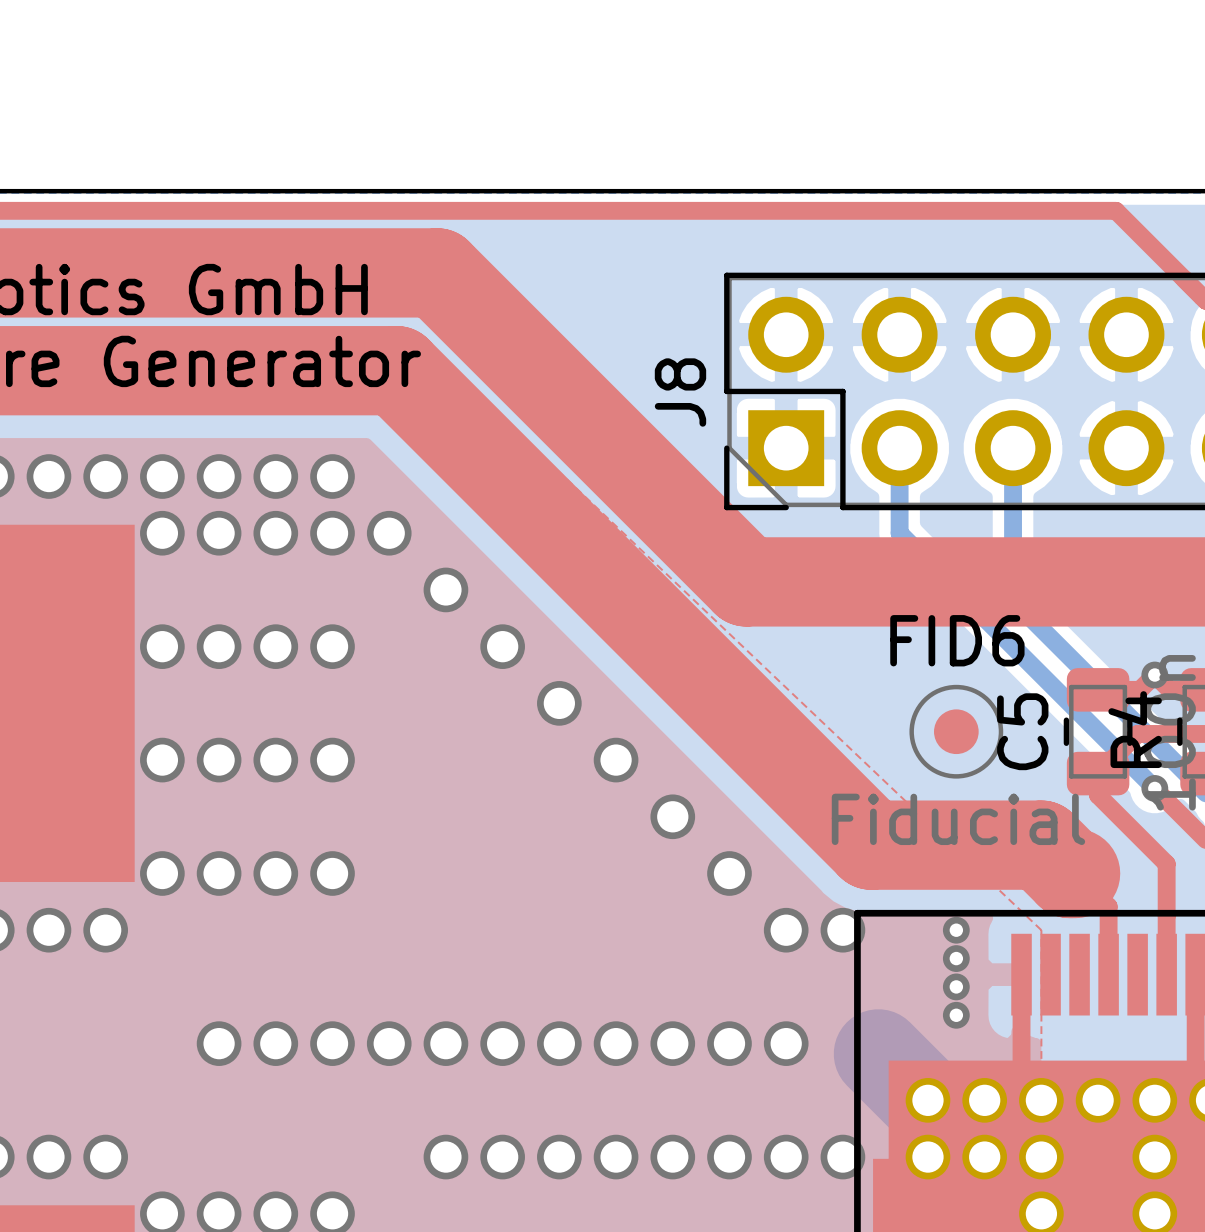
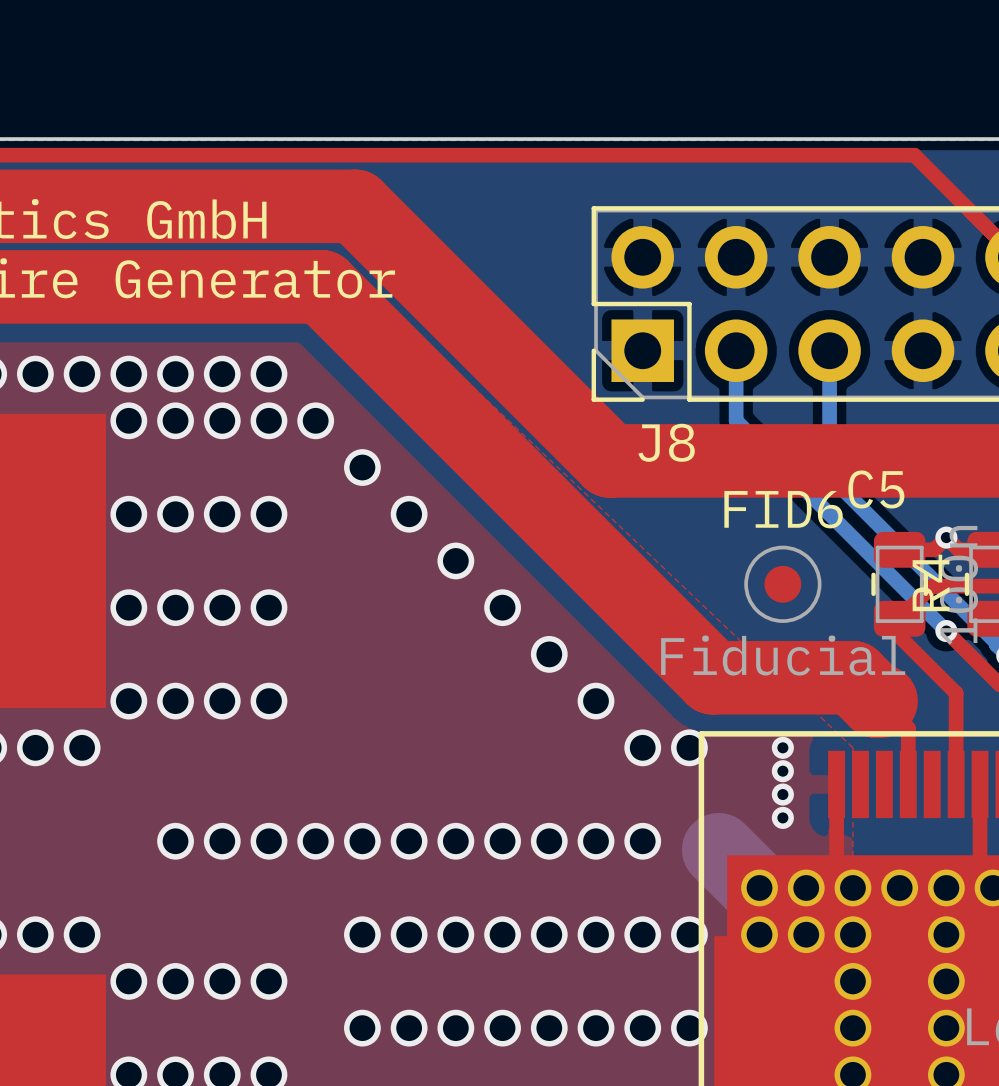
J8 name rotation: 0° (680, 392) -> 90° clockwise (666, 442)
J8 name position: J8 (680, 392) -> J8 (666, 442)
C5 name rotation: 0° (1022, 731) -> 90° clockwise (876, 489)
C5 name position: C5 (1022, 731) -> C5 (876, 489)

